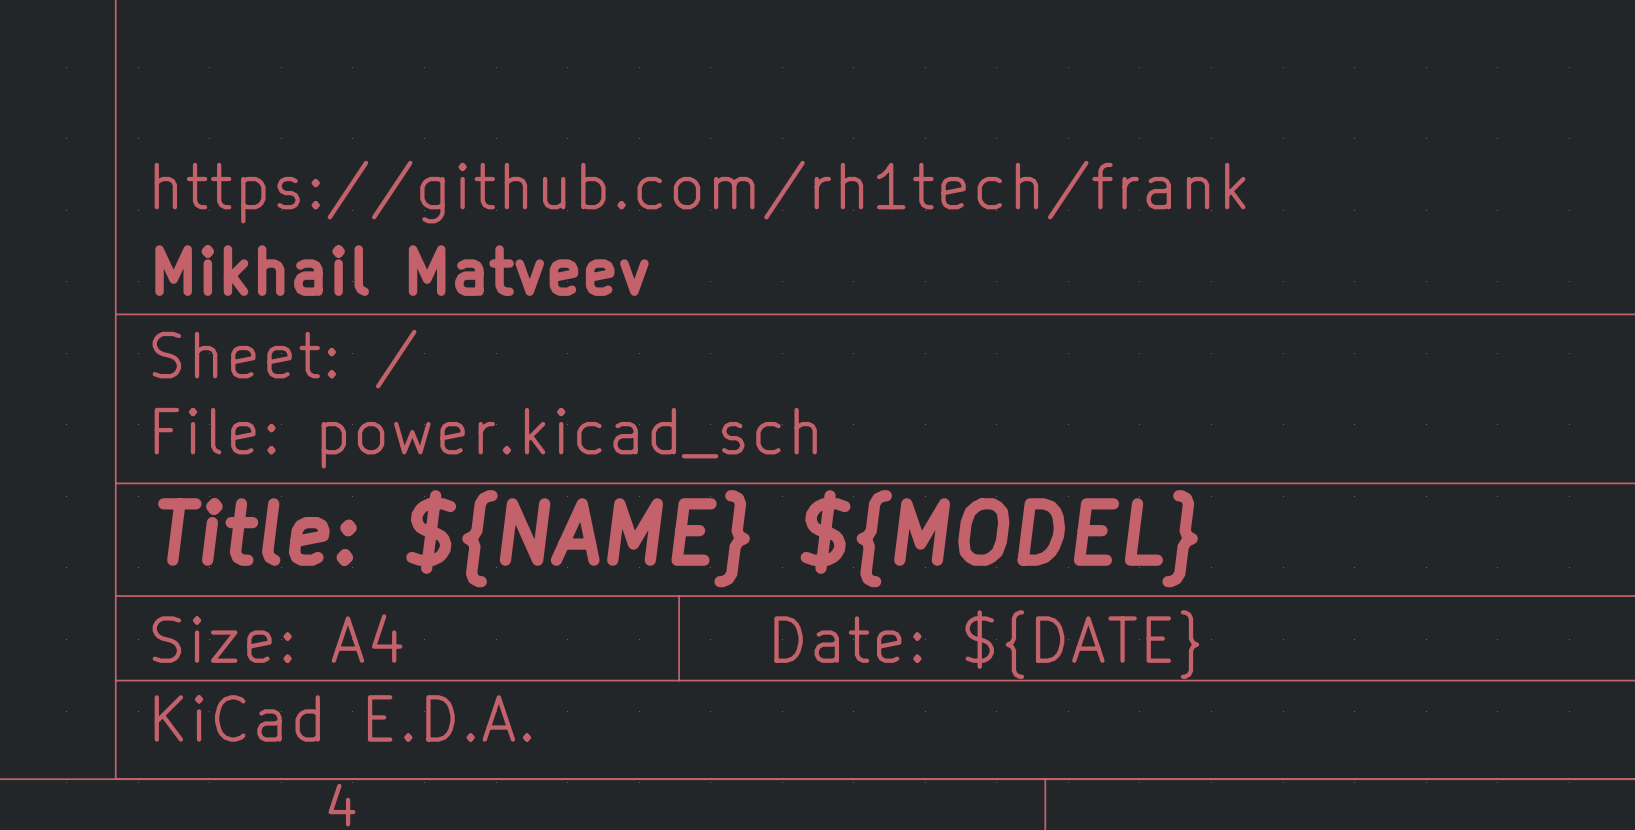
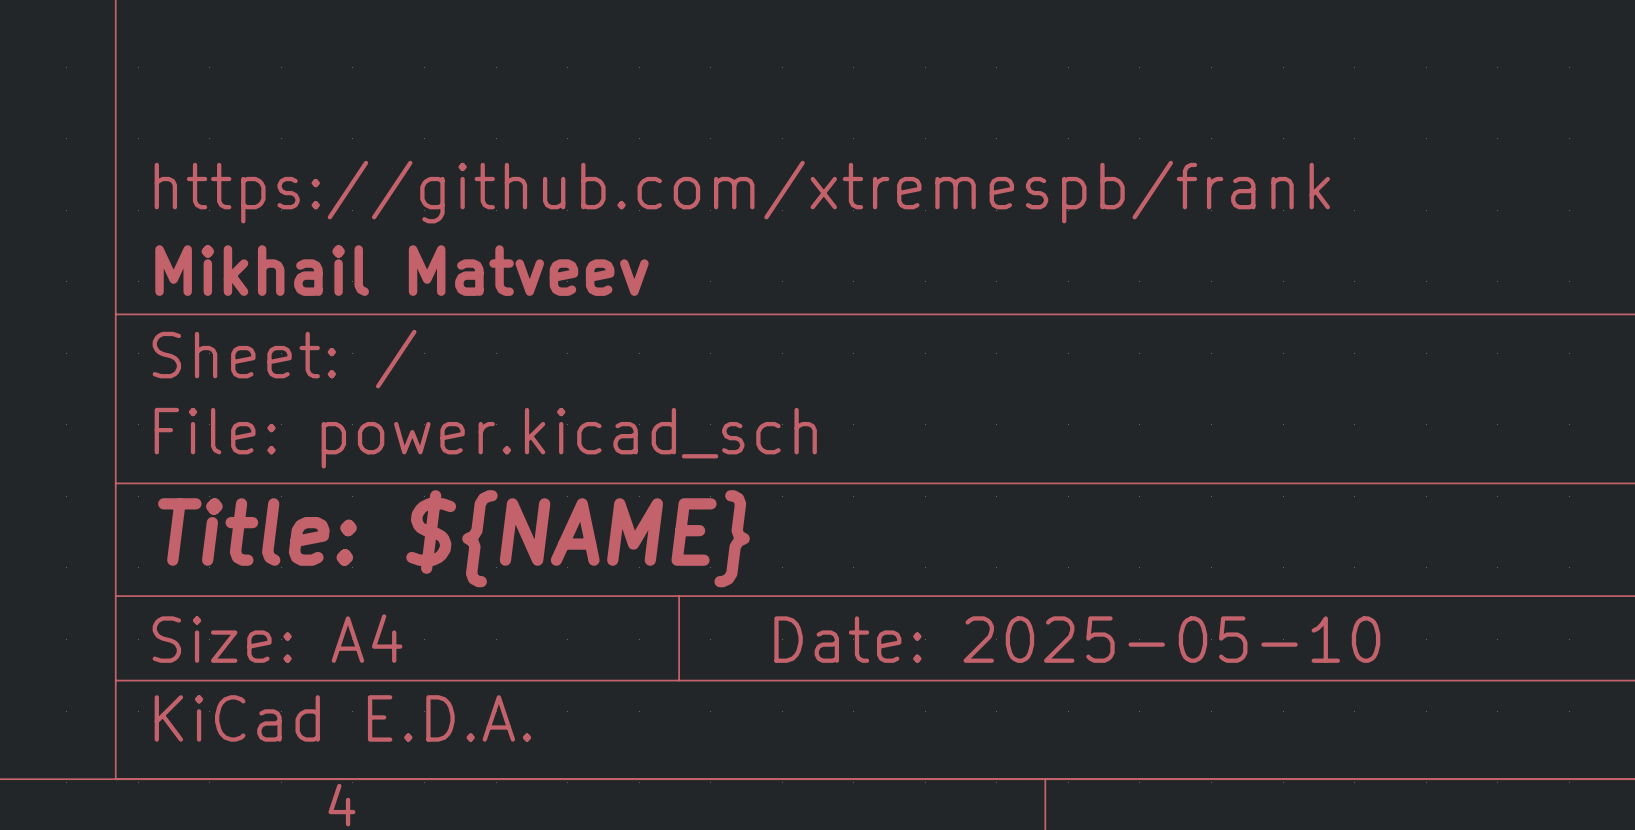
title block: https://github.com/rh1tech/frank (700, 192) -> https://github.com/xtremespb/frank (742, 192)
title block: Title: ${NAME} ${MODEL} (677, 538) -> Title: ${NAME} (453, 538)
title block: Date: ${DATE} (986, 644) -> Date: 2025-05-10 (1077, 639)

